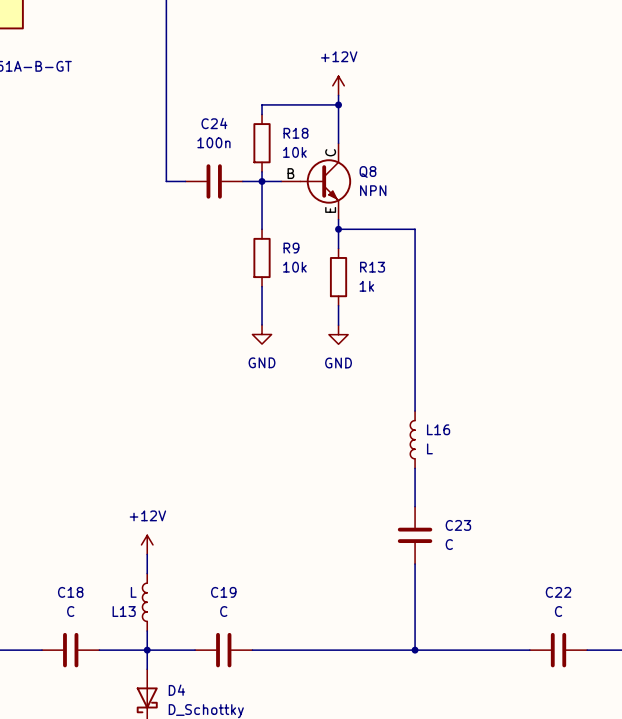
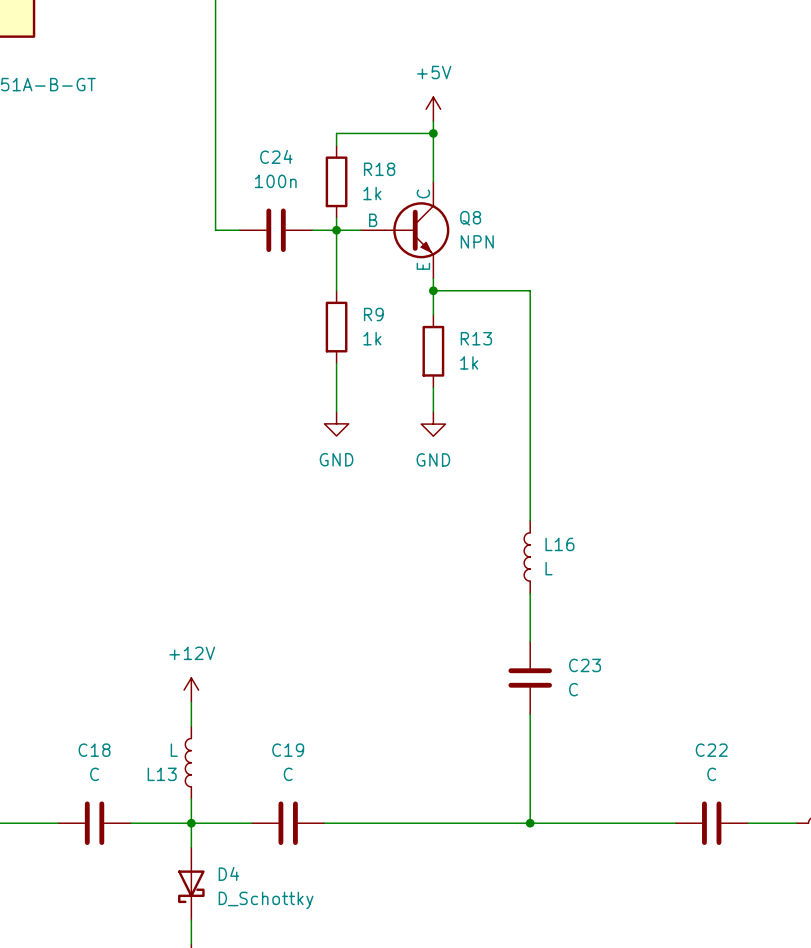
power symbol: +12V (338, 85) -> +5V (433, 109)
R18 value: 10k (294, 152) -> 1k (372, 193)
R9 value: 10k (294, 267) -> 1k (372, 338)

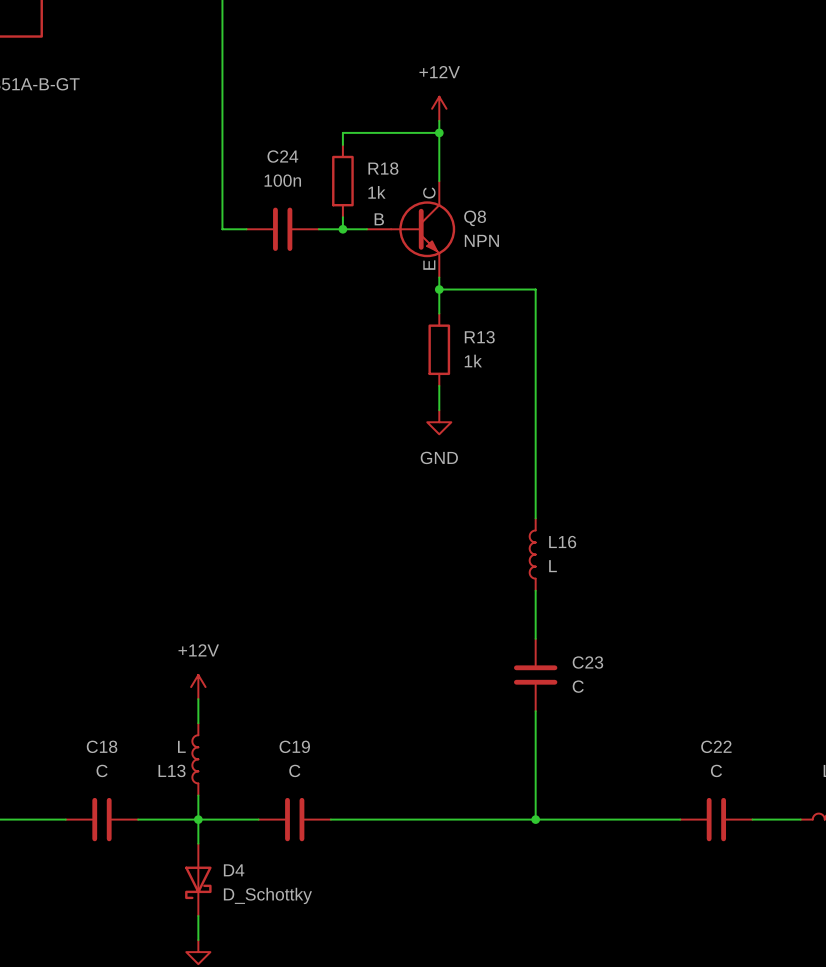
power symbol: +5V (433, 109) -> +12V (439, 108)
wire: (336, 230) (336, 290) -> none
R9: 1k (336, 327) -> none
wire: (336, 363) (336, 411) -> none
power symbol: GND (336, 423) -> none

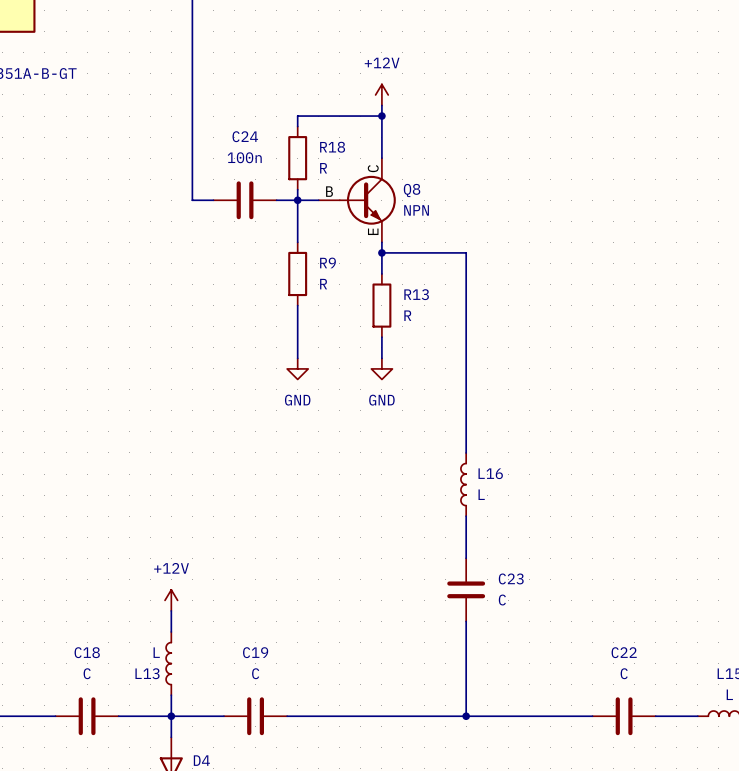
R18 value: 1k (376, 192) -> R (323, 168)
wire: none -> (297, 200) (297, 242)
R9: none -> R (297, 273)
wire: none -> (297, 305) (297, 358)
R13 value: 1k (473, 361) -> R (407, 315)
power symbol: none -> GND (297, 368)

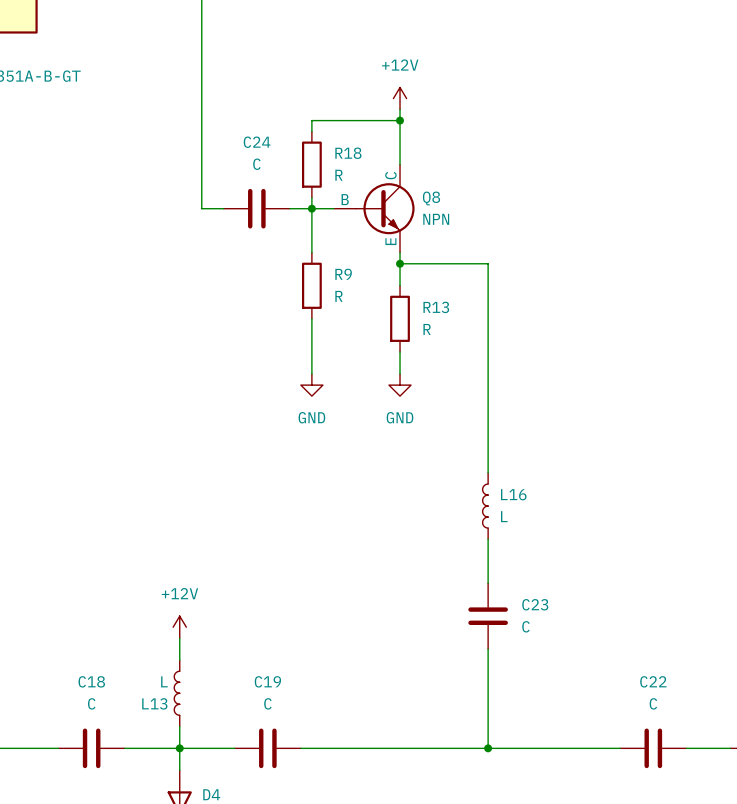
C24 value: 100n (244, 157) -> C (256, 164)

